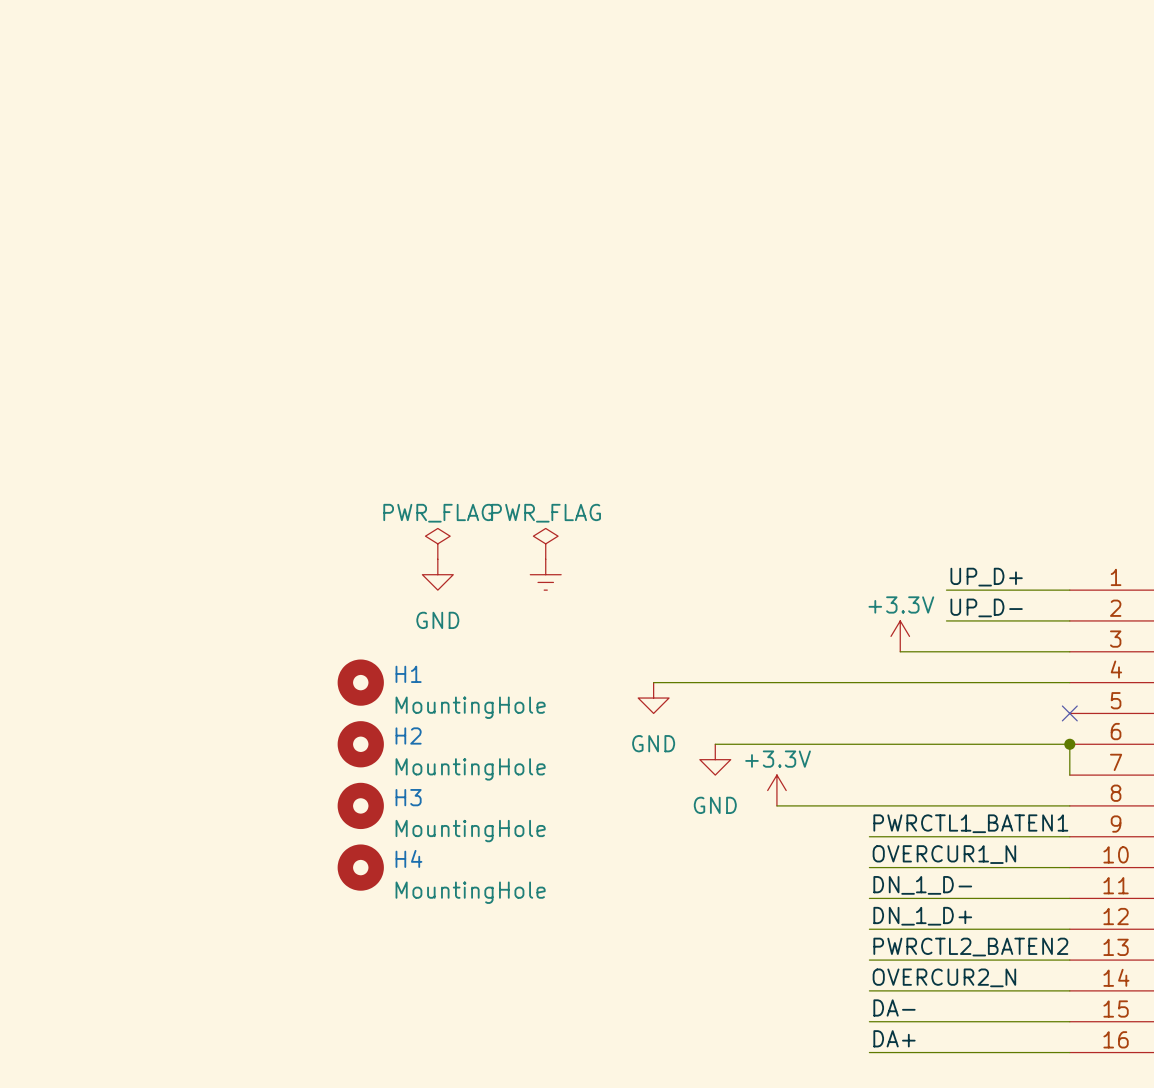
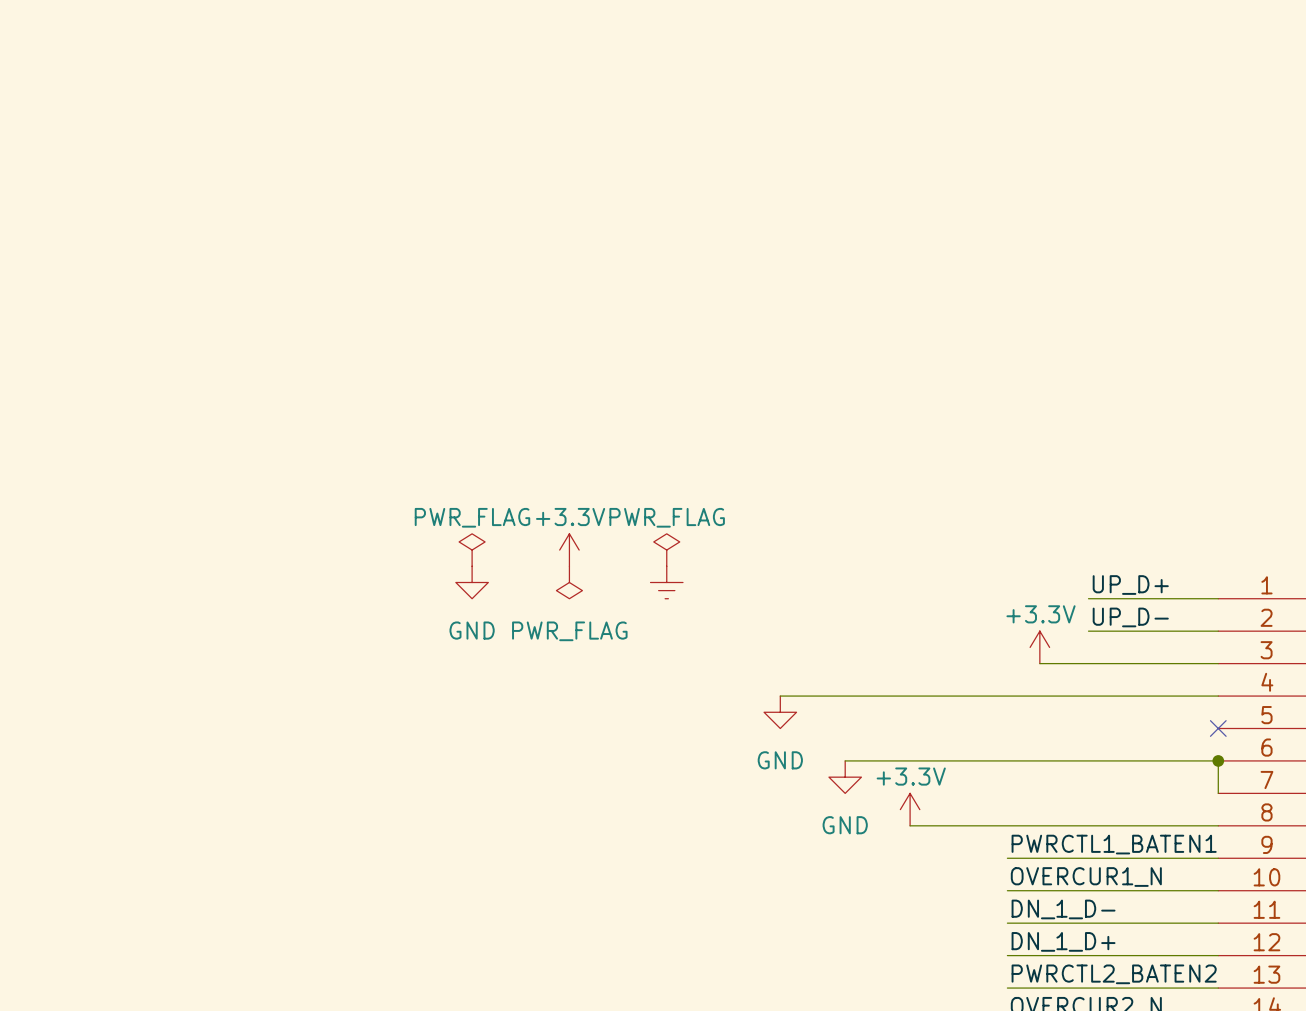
power symbol: none -> PWR_FLAG (472, 550)
power symbol rotation: 0° (437, 543) -> 180° (569, 582)
power symbol position: PWR_FLAG (437, 543) -> PWR_FLAG (569, 582)
power symbol: none -> +3.3V (569, 550)
power symbol position: GND (437, 574) -> GND (472, 582)
H1: MountingHole (360, 682) -> none
H2: MountingHole (360, 744) -> none
H3: MountingHole (360, 805) -> none
H4: MountingHole (360, 867) -> none

